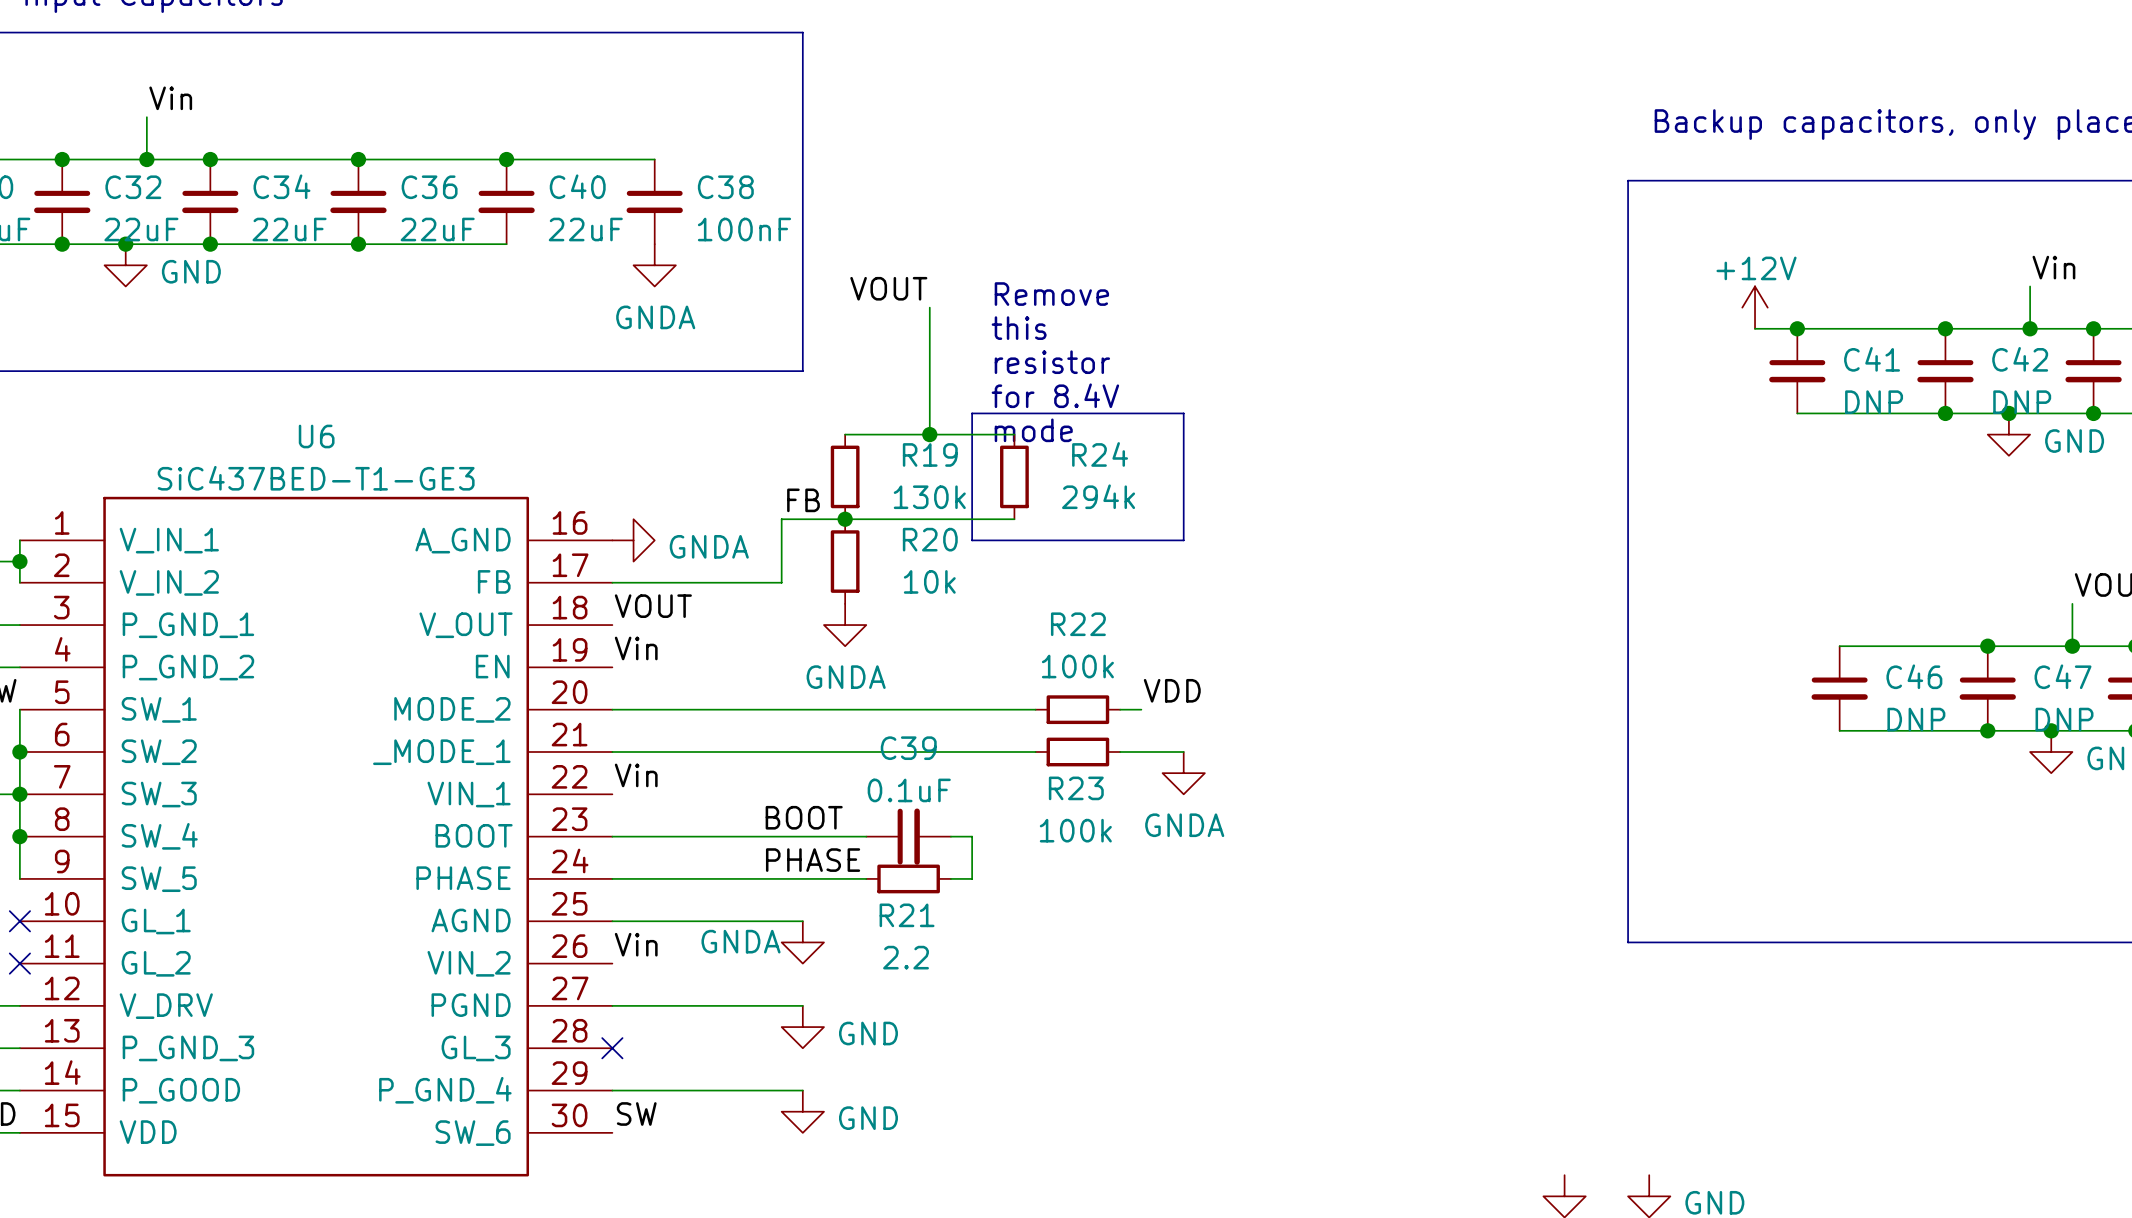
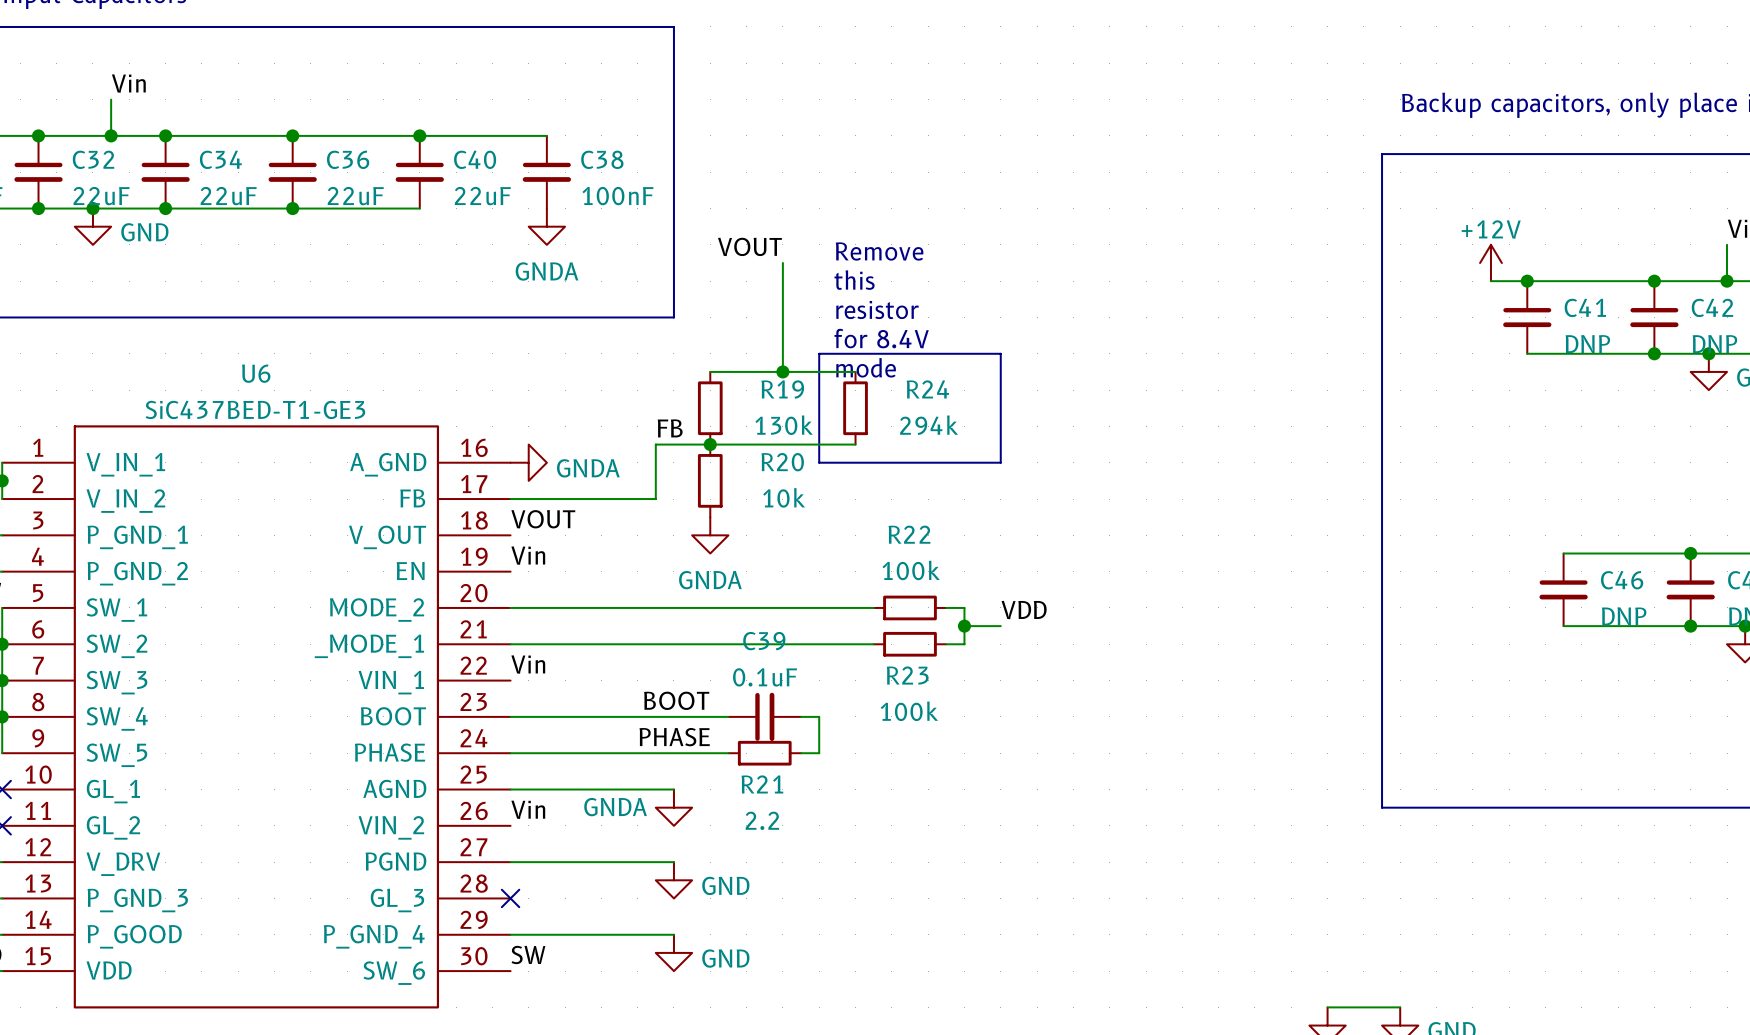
label position: VDD (1172, 690) -> VDD (1024, 610)
wire: none -> (964, 626) (1000, 626)
junction: none -> (964, 626)
wire: (1141, 751) (1183, 751) -> (964, 644) (964, 607)
power symbol: GNDA (1183, 773) -> none
wire: none -> (1327, 1007) (1400, 1007)

